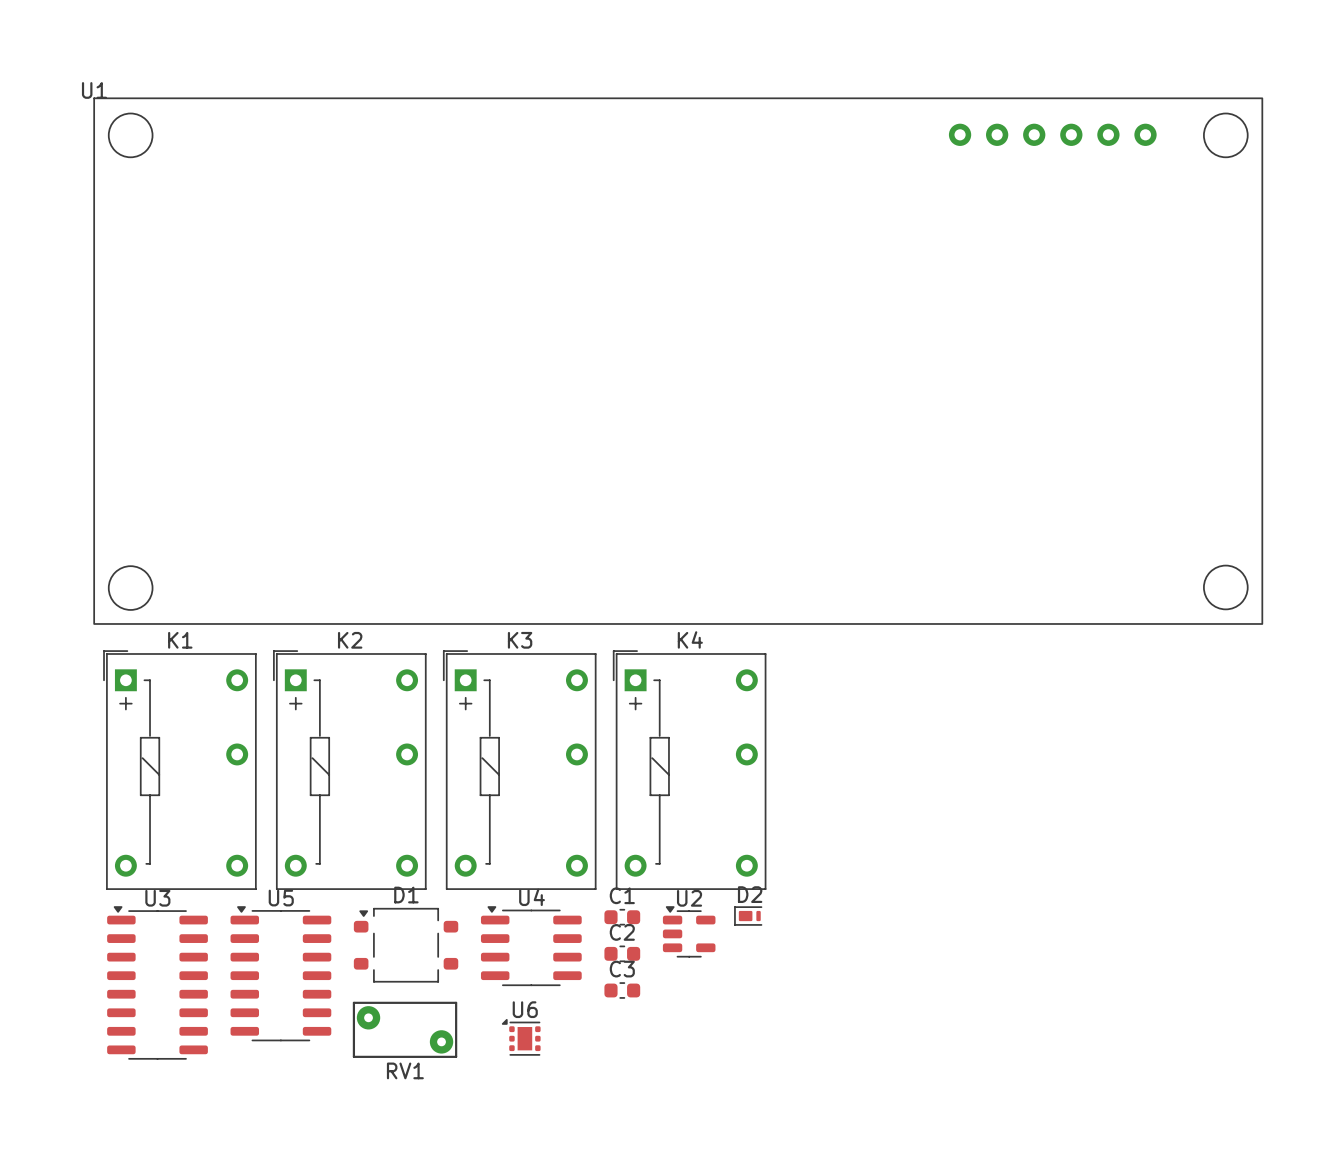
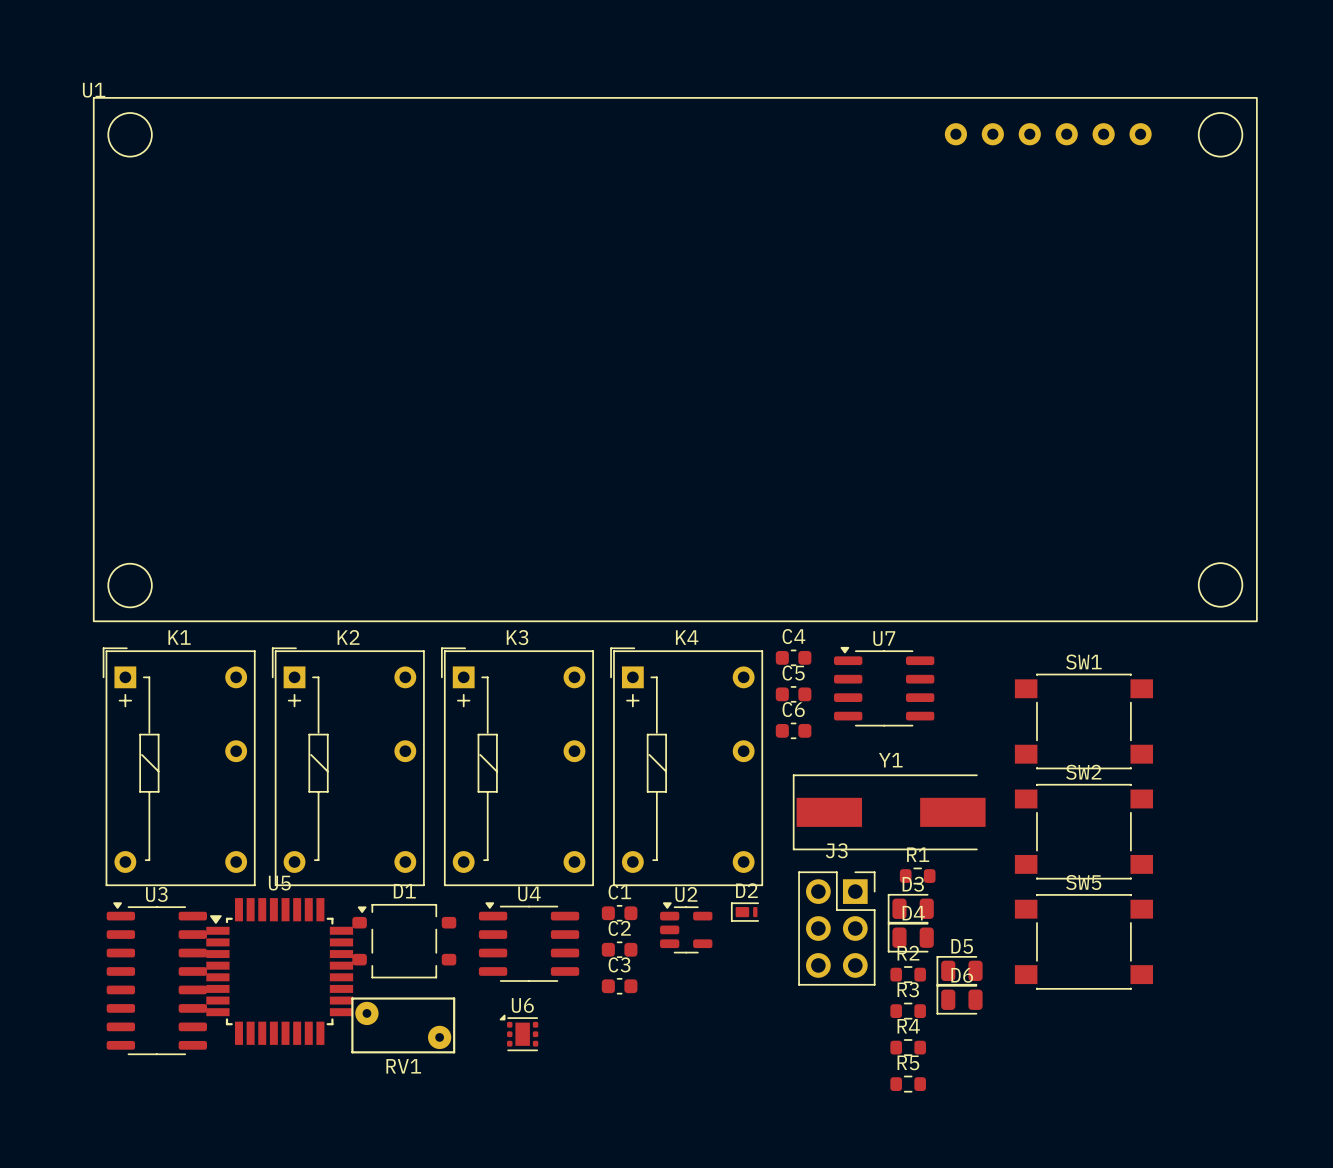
C4: none -> (793, 657)
U7: none -> (884, 686)
C5: none -> (793, 694)
SW1: none -> (1083, 721)
C6: none -> (793, 730)
Y1: none -> (889, 812)
SW2: none -> (1083, 831)
R1: none -> (917, 876)
U5 footprint: [230, 906, 332, 1042] -> [206, 898, 354, 1045]
D3: none -> (910, 908)
J3: none -> (836, 928)
D4: none -> (910, 937)
SW5: none -> (1083, 941)
D5: none -> (959, 970)
R2: none -> (908, 974)
D6: none -> (959, 999)
R3: none -> (908, 1011)
R4: none -> (908, 1047)
R5: none -> (908, 1084)

